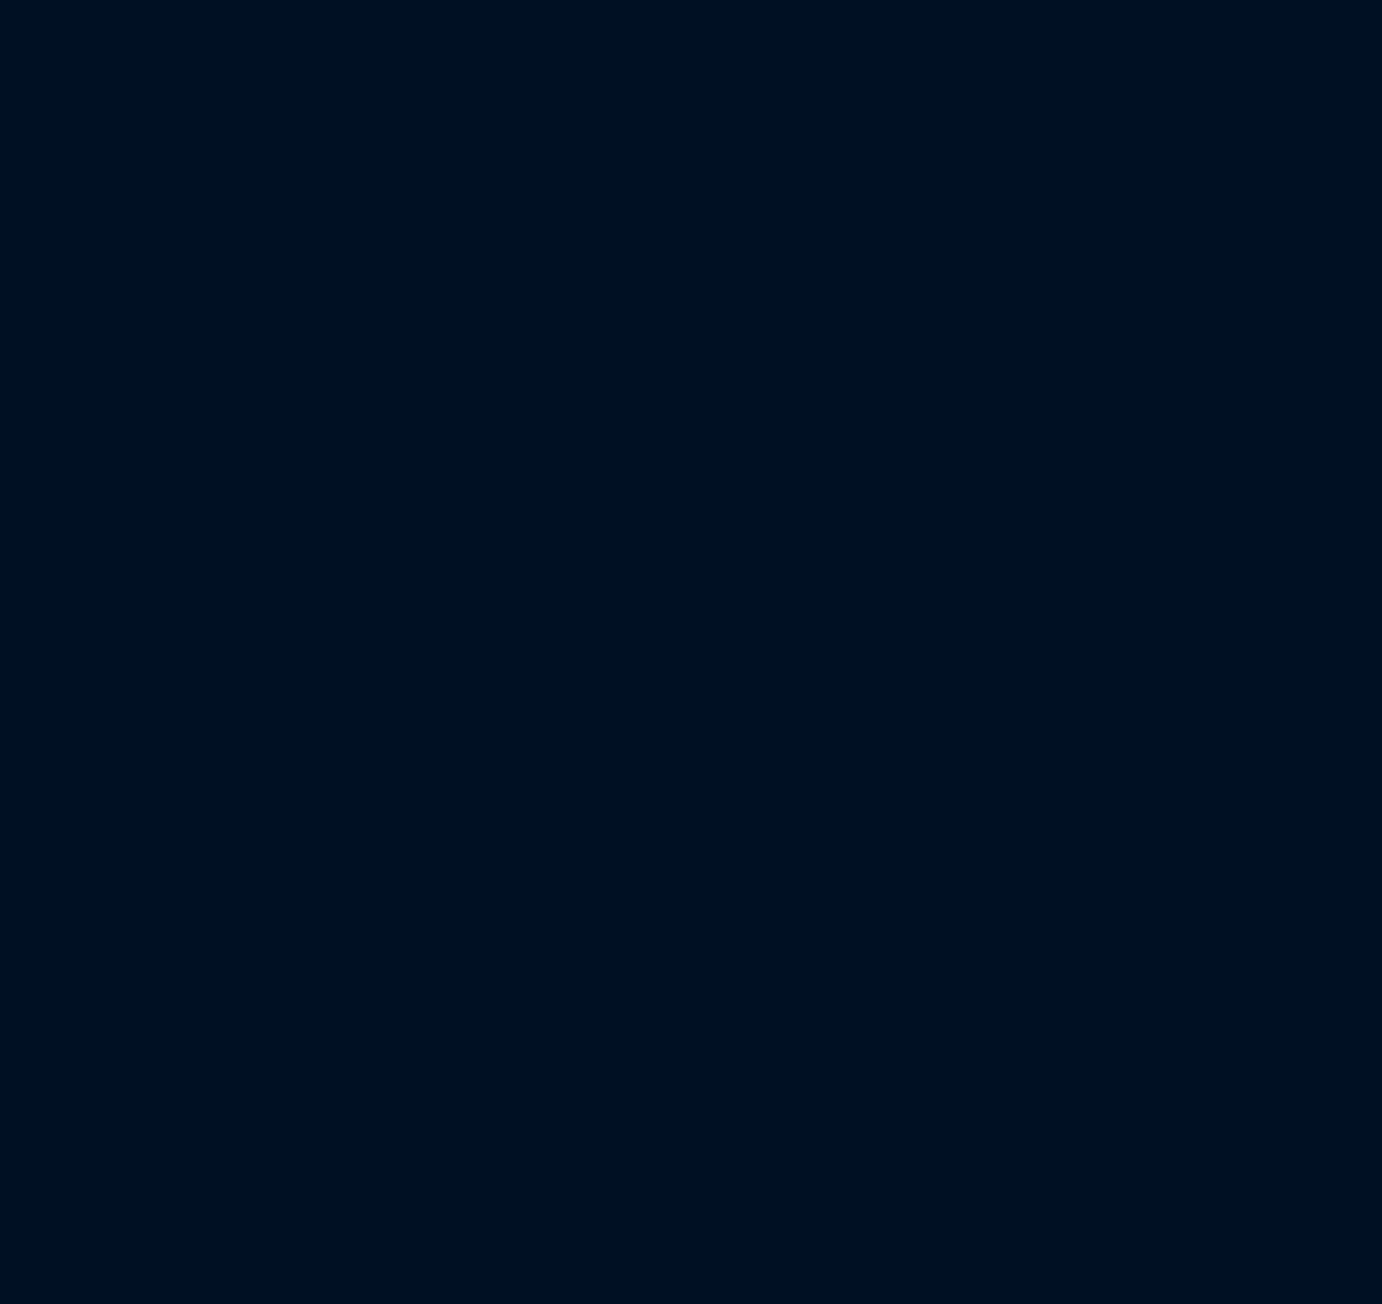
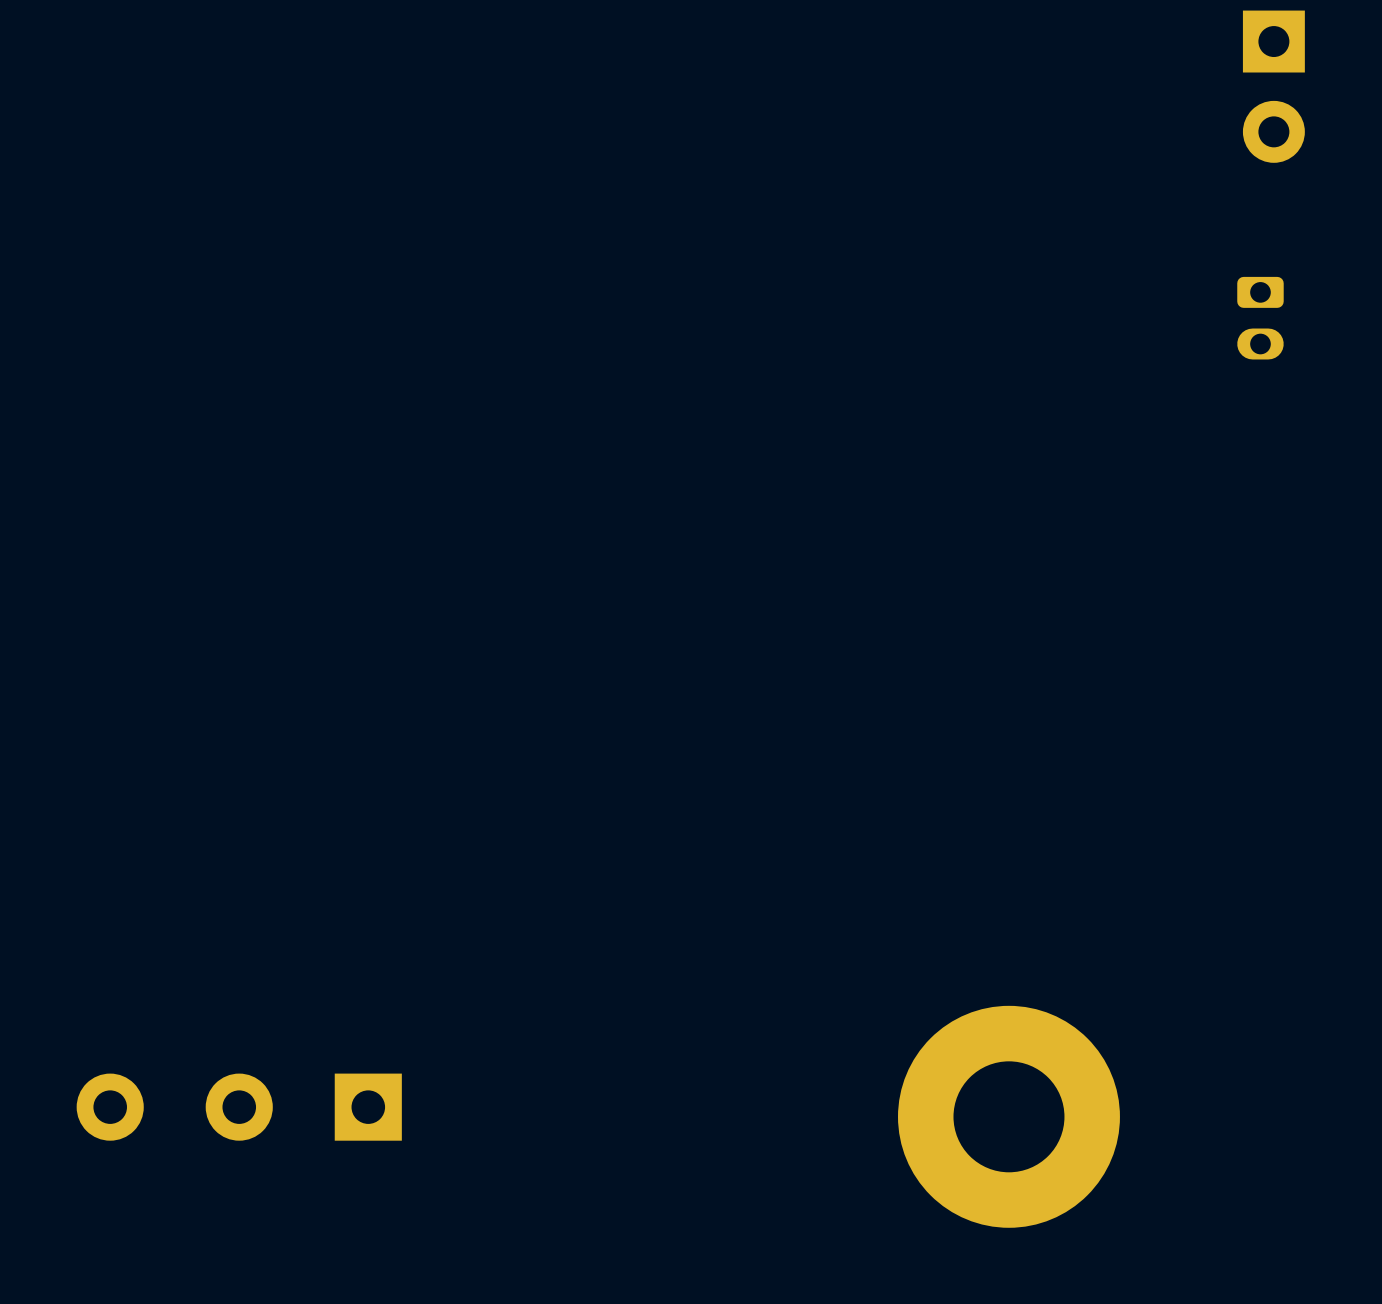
part: none -> (1273, 86)
part: none -> (1260, 318)
part: none -> (239, 1107)
part: none -> (1008, 1116)

